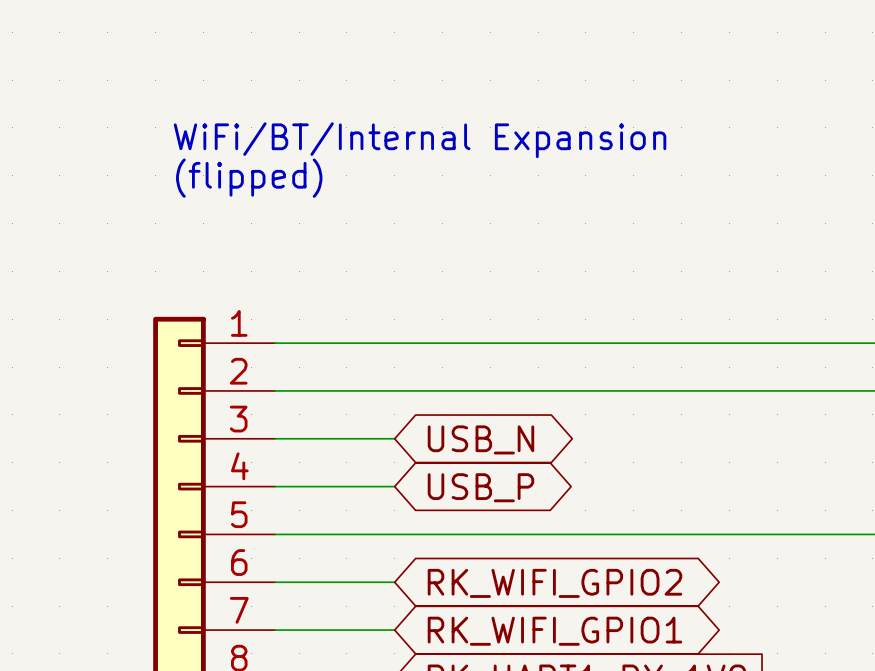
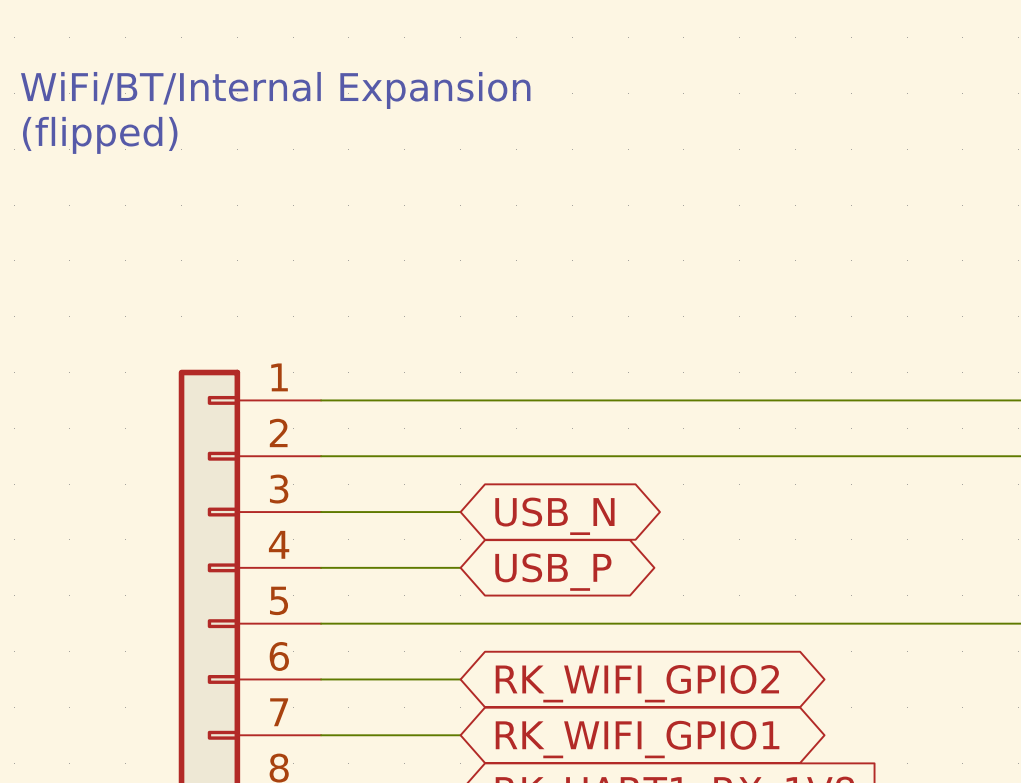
text position: WiFi/BT/Internal Expansion (420, 140) -> WiFi/BT/Internal Expansion (275, 90)
text position: (flipped) (249, 178) -> (flipped) (100, 135)

